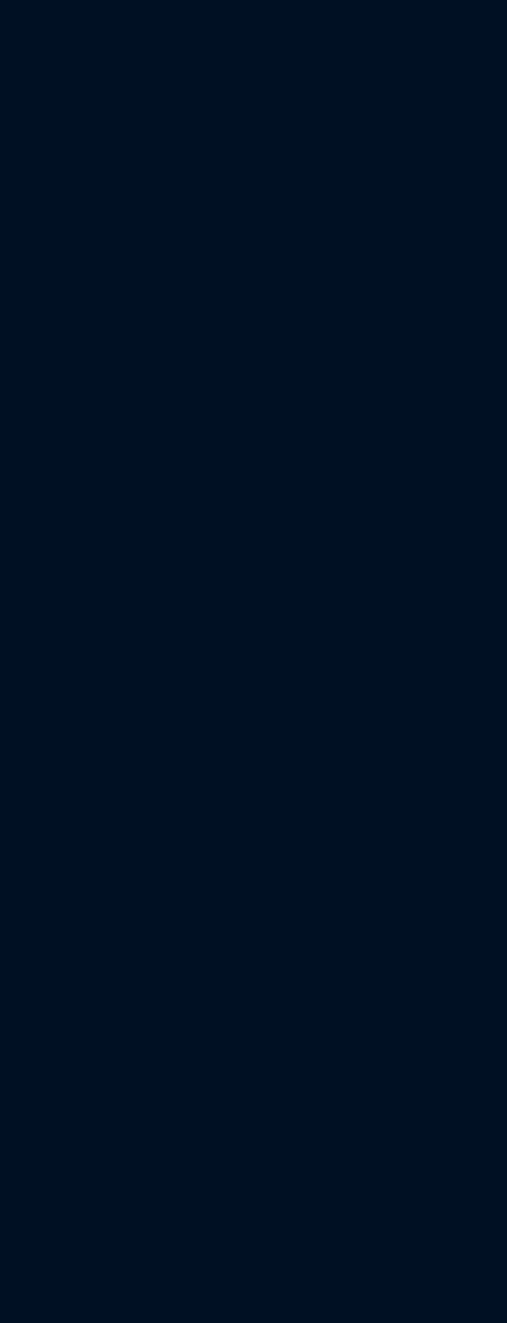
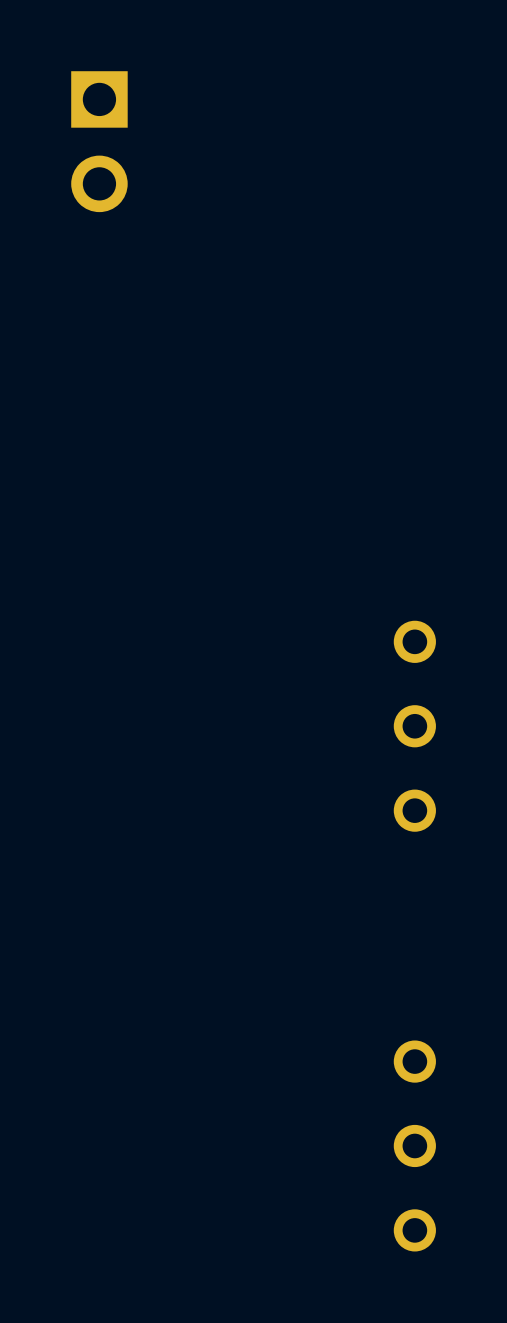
part: none -> (99, 141)
part: none -> (414, 726)
part: none -> (414, 1145)

